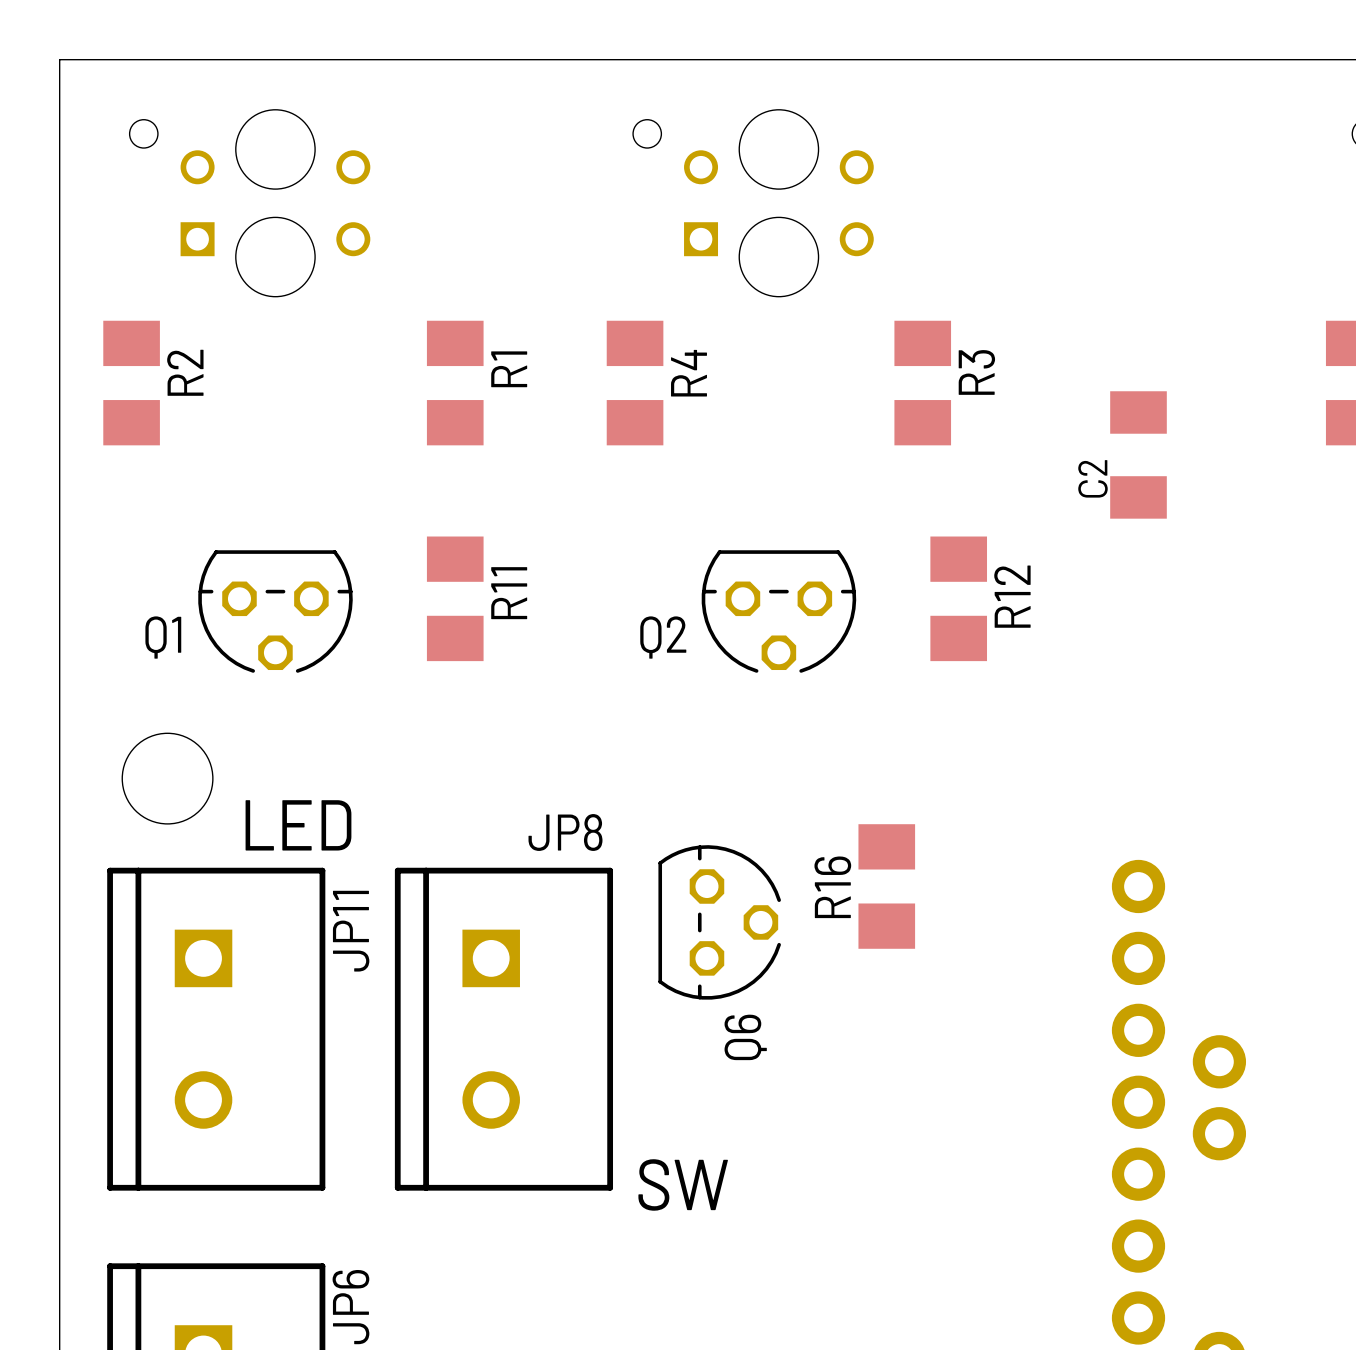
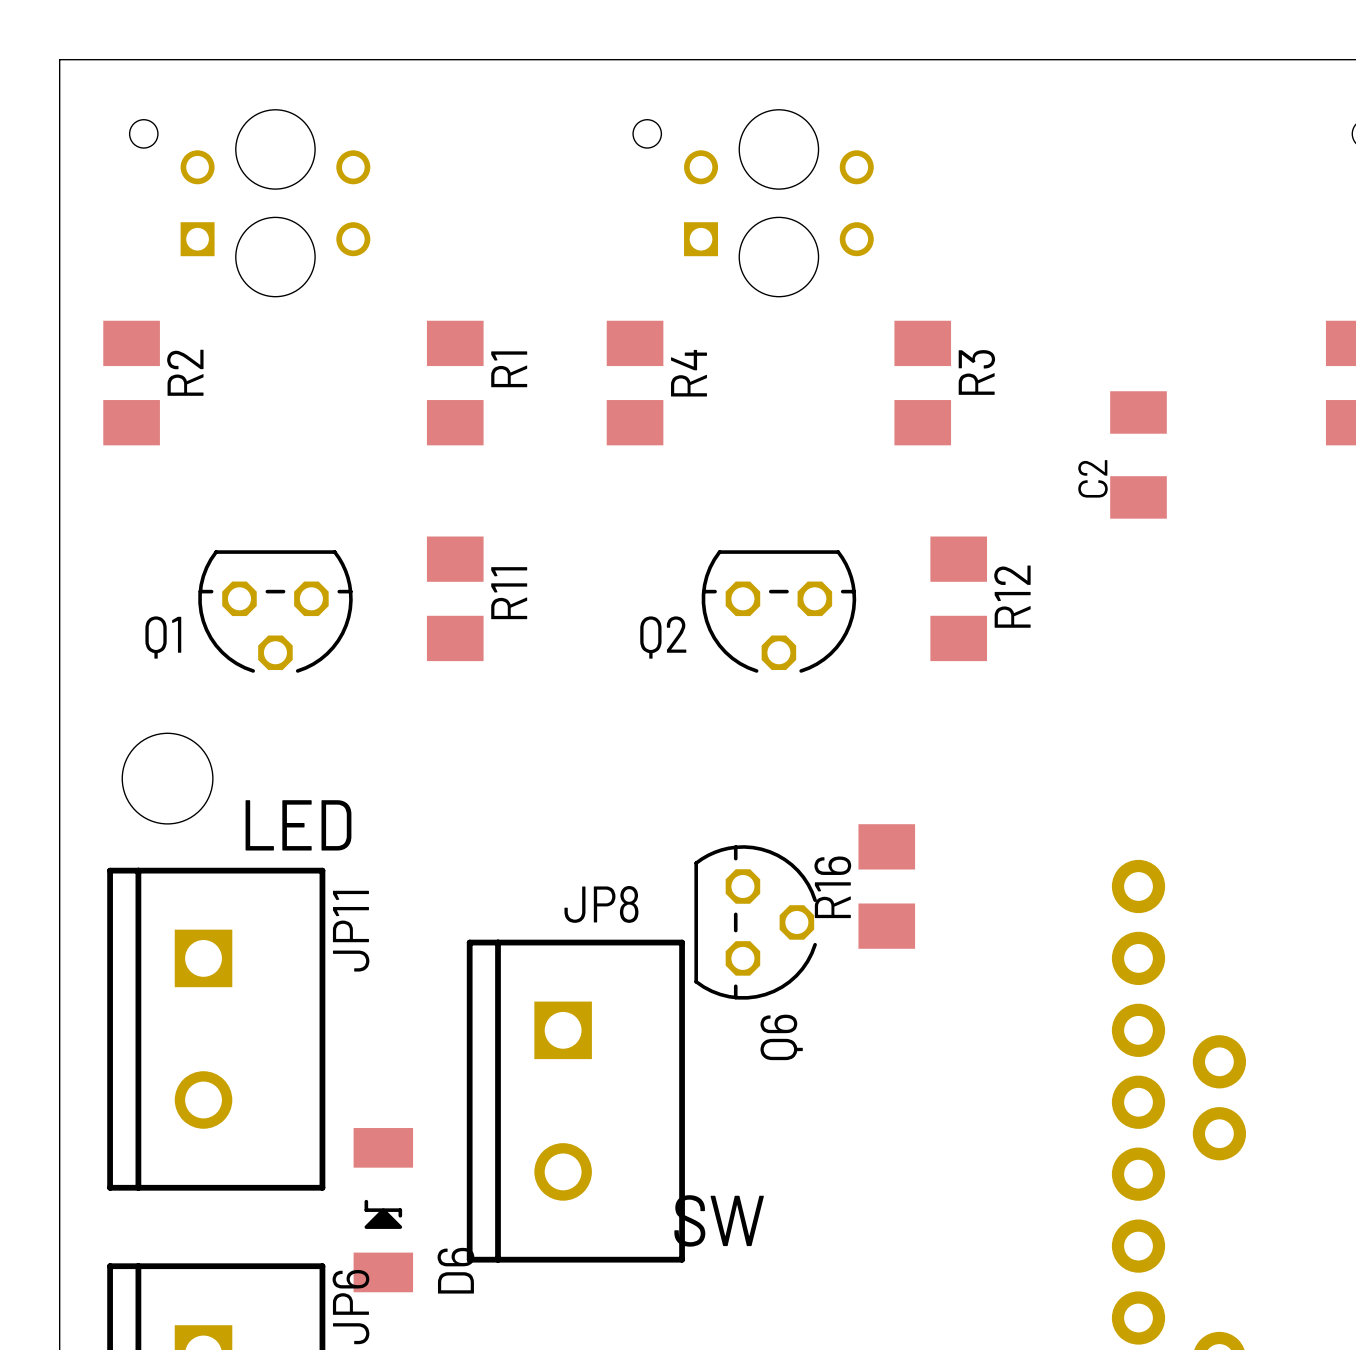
JP8 name position: JP8 (565, 832) -> JP8 (601, 904)
Q6 position: (719, 922) -> (755, 922)
JP8 position: (503, 1029) -> (575, 1101)
text position: SW (683, 1184) -> SW (719, 1220)
D6: none -> (383, 1210)

